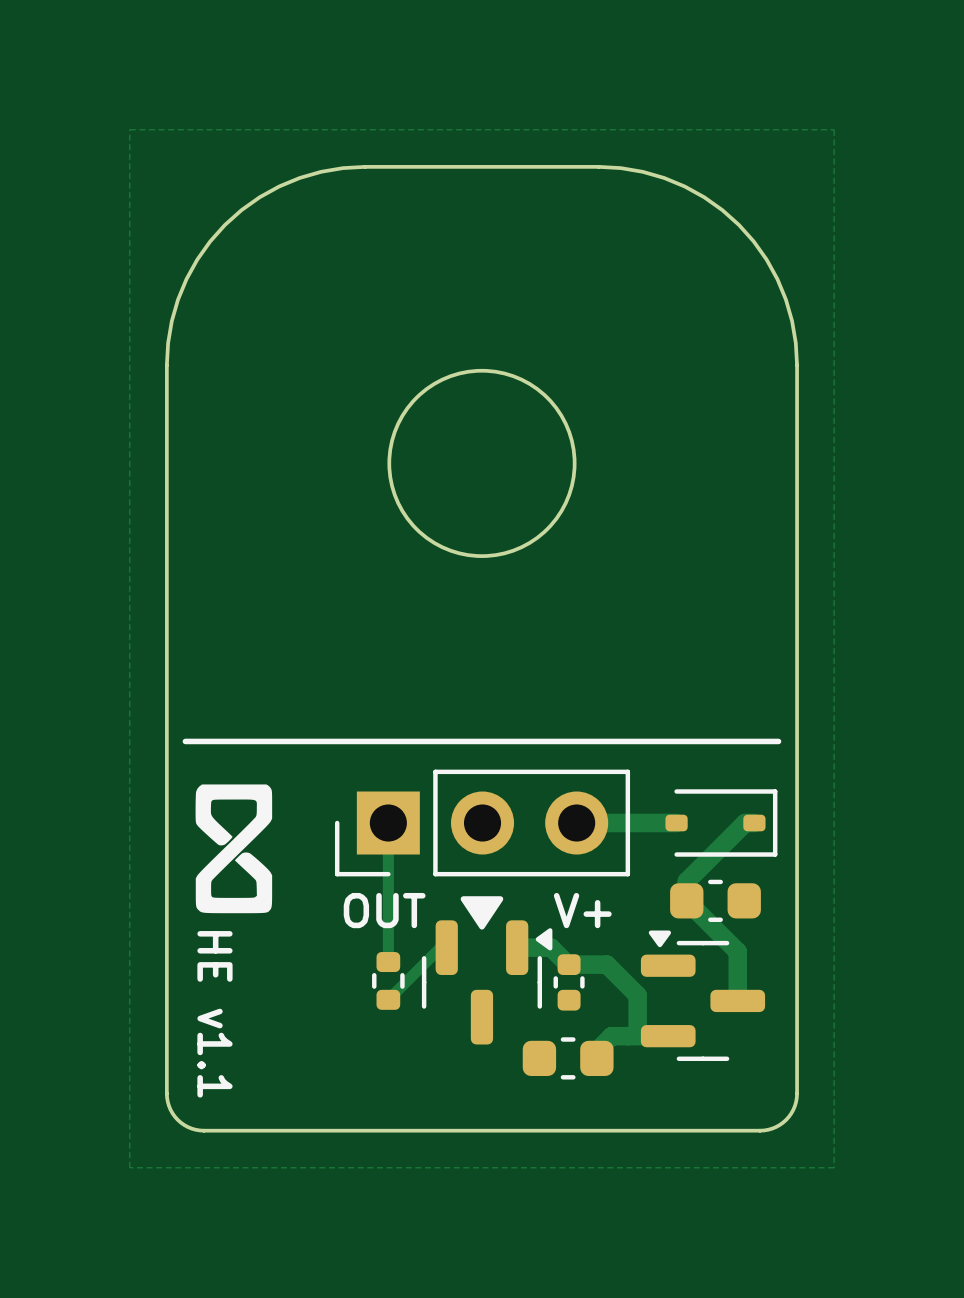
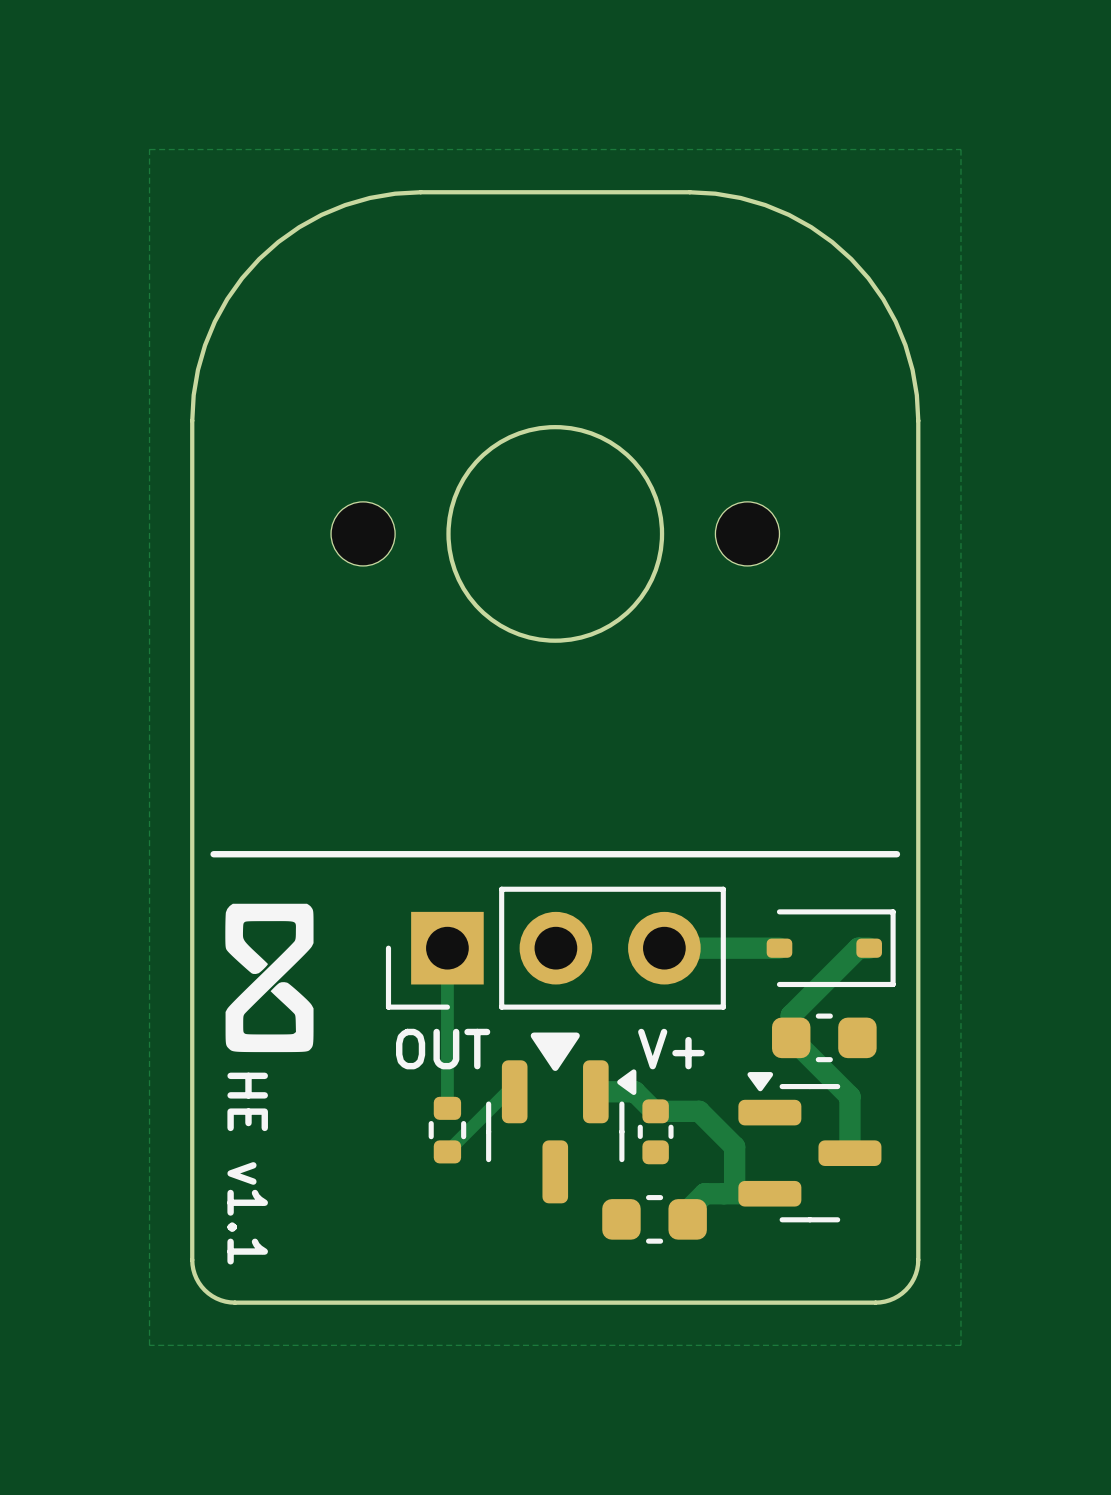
part: none -> (363, 533)
part: none -> (747, 533)

